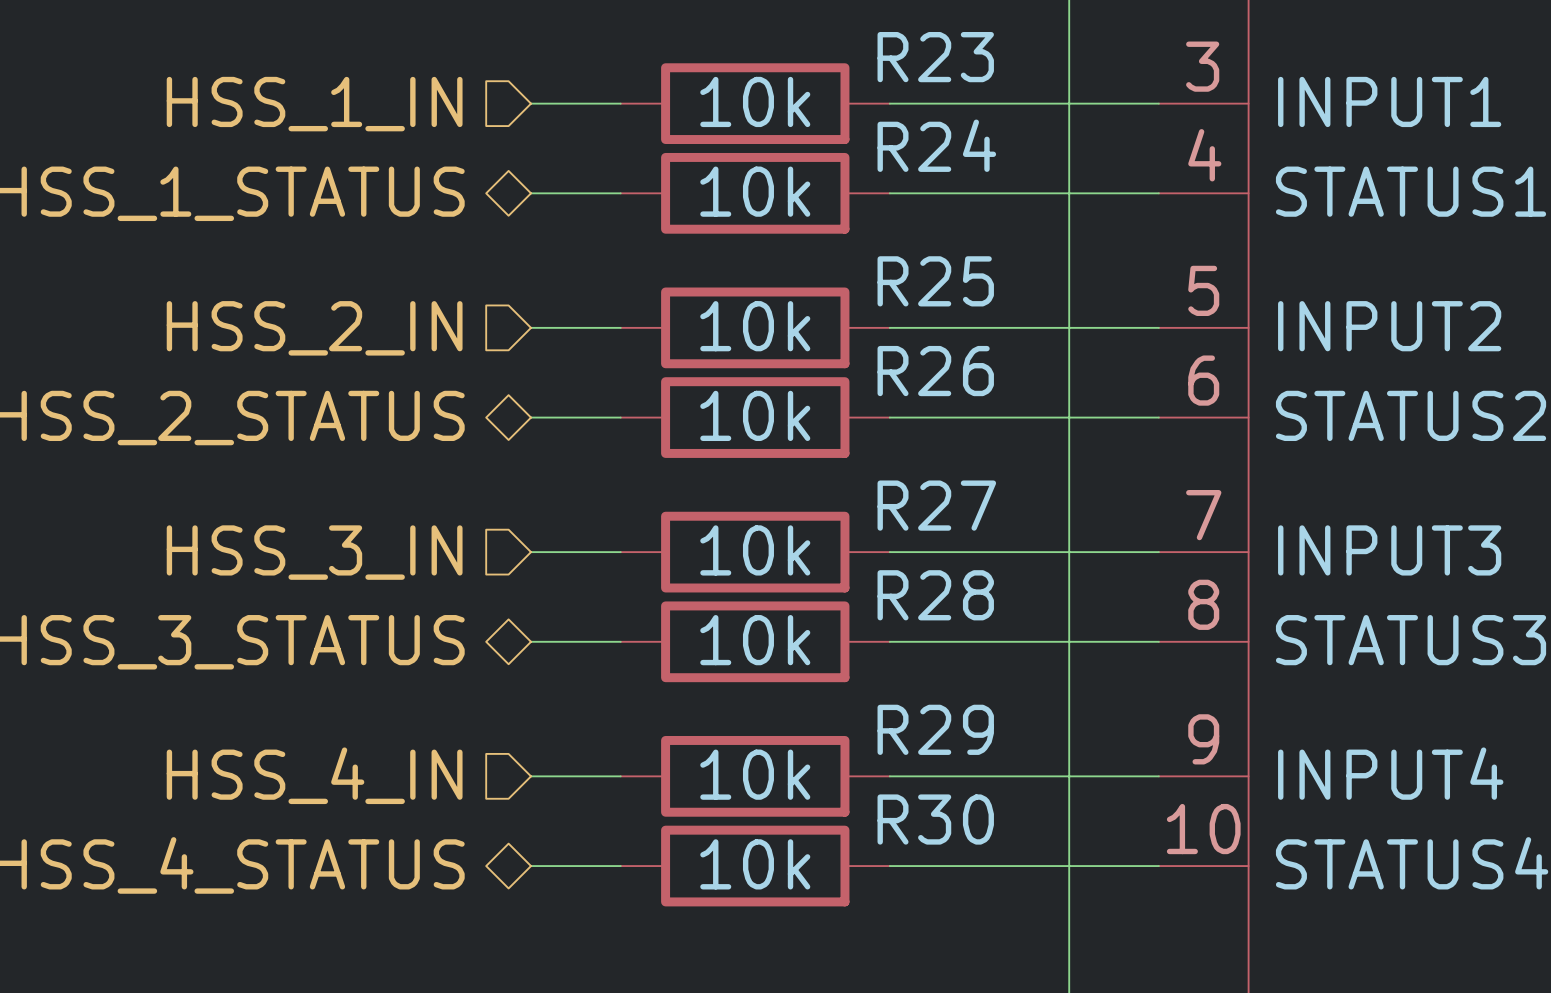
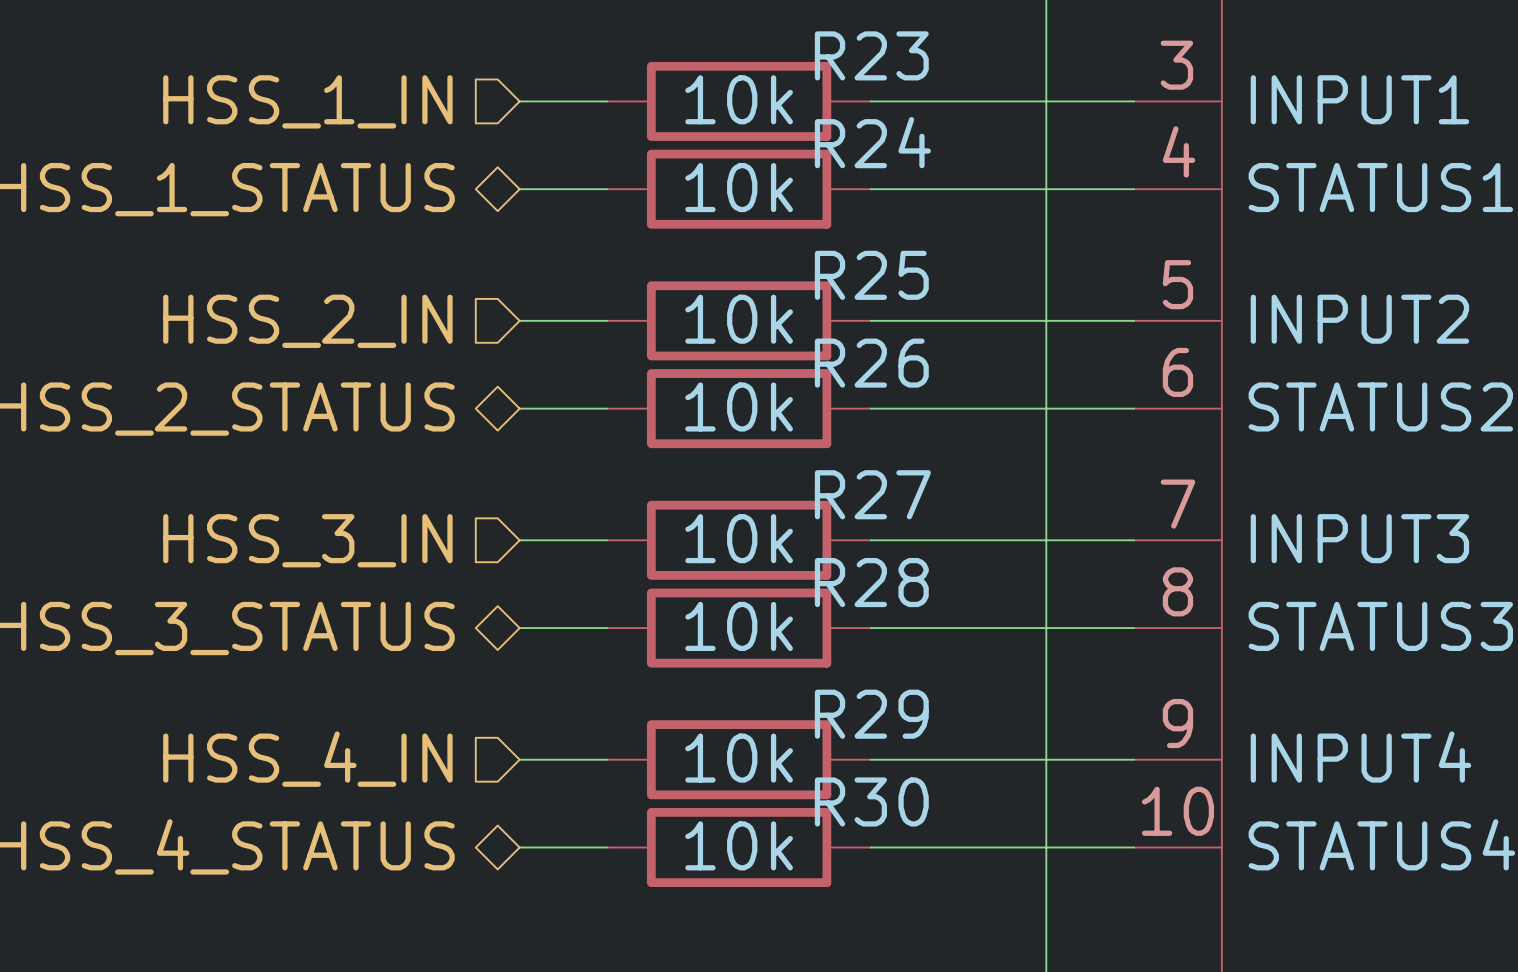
R23 name position: R23 (935, 57) -> R23 (871, 55)
R24 name position: R24 (936, 145) -> R24 (872, 142)
R25 name position: R25 (935, 281) -> R25 (871, 275)
R26 name position: R26 (935, 371) -> R26 (871, 363)
R27 name position: R27 (936, 505) -> R27 (872, 494)
R28 name position: R28 (935, 595) -> R28 (871, 582)
R29 name position: R29 (935, 729) -> R29 (871, 714)
R30 name position: R30 (935, 819) -> R30 (871, 801)

